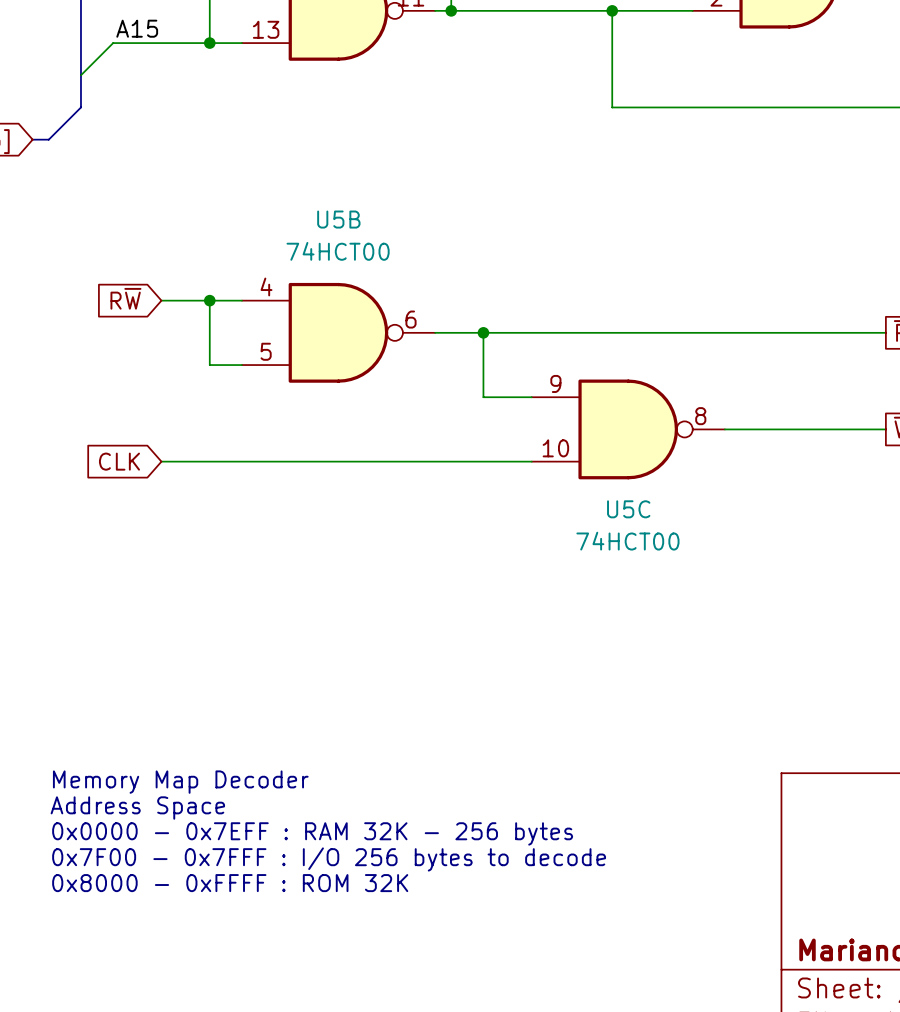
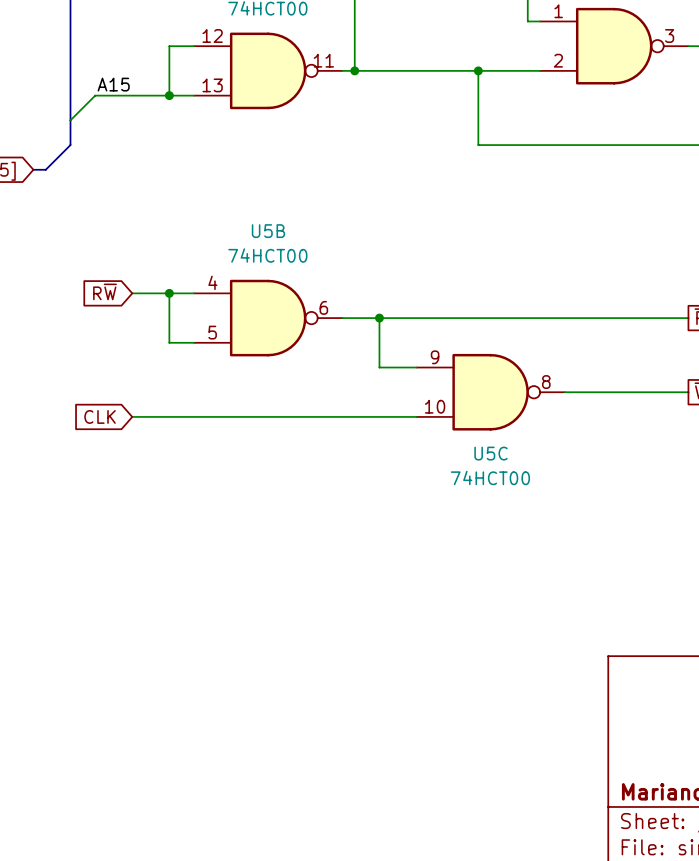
text: Memory Map Decoder (180, 782) -> none
text: Address Space (137, 808) -> none
text: 0x0000 - 0x7EFF : RAM 32K - 256 bytes (312, 833) -> none
text: 0x7F00 - 0x7FFF : I/O 256 bytes to decode (329, 859) -> none
text: 0x8000 - 0xFFFF : ROM 32K (230, 883) -> none

